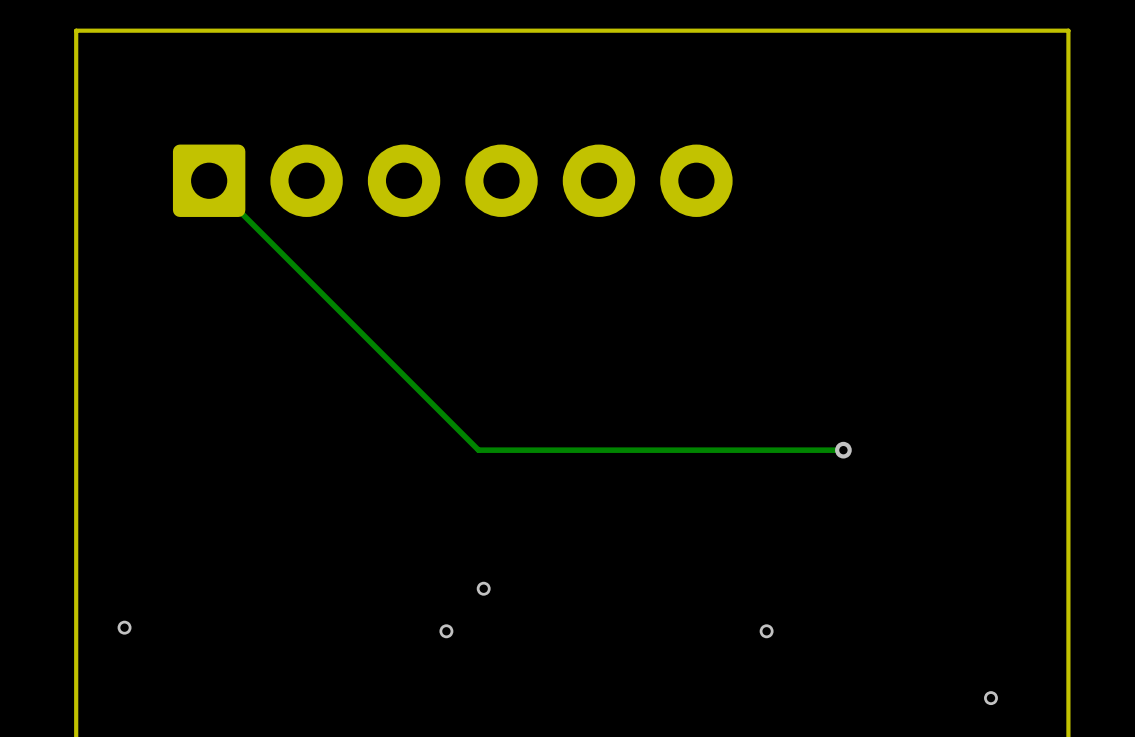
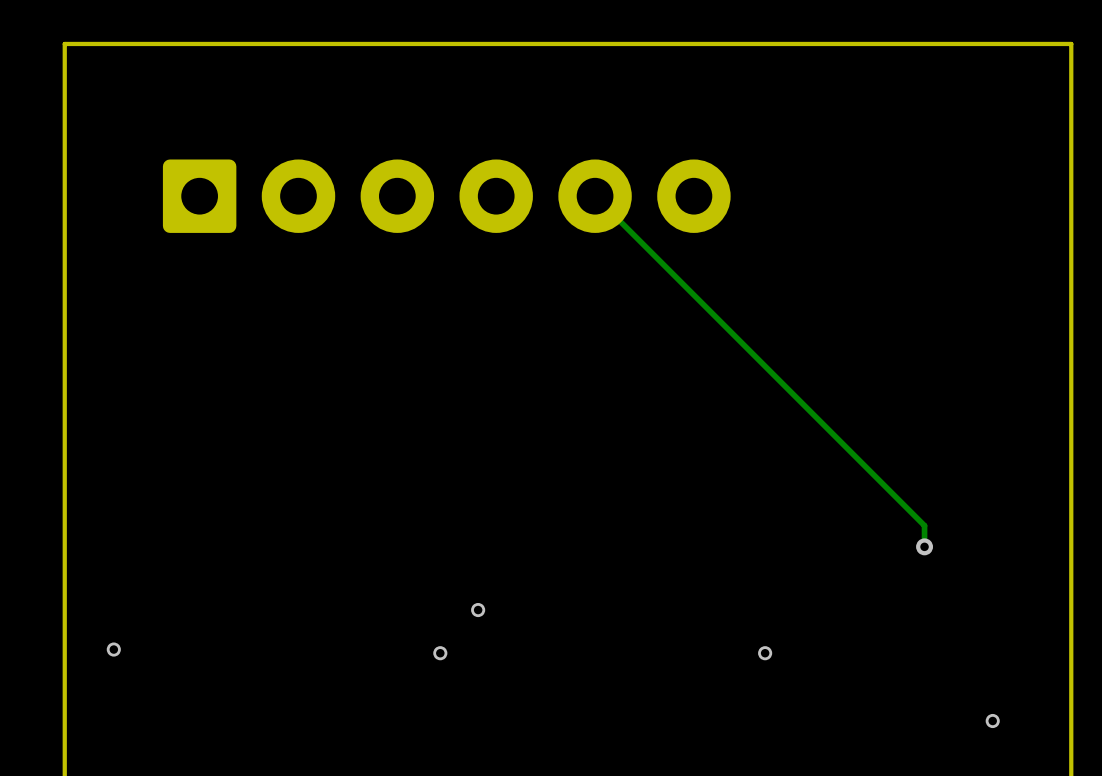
track: (209, 180) (478, 450) (843, 450) -> none
track: none -> (595, 196) (924, 525) (924, 546)
via position: (843, 450) -> (924, 546)

